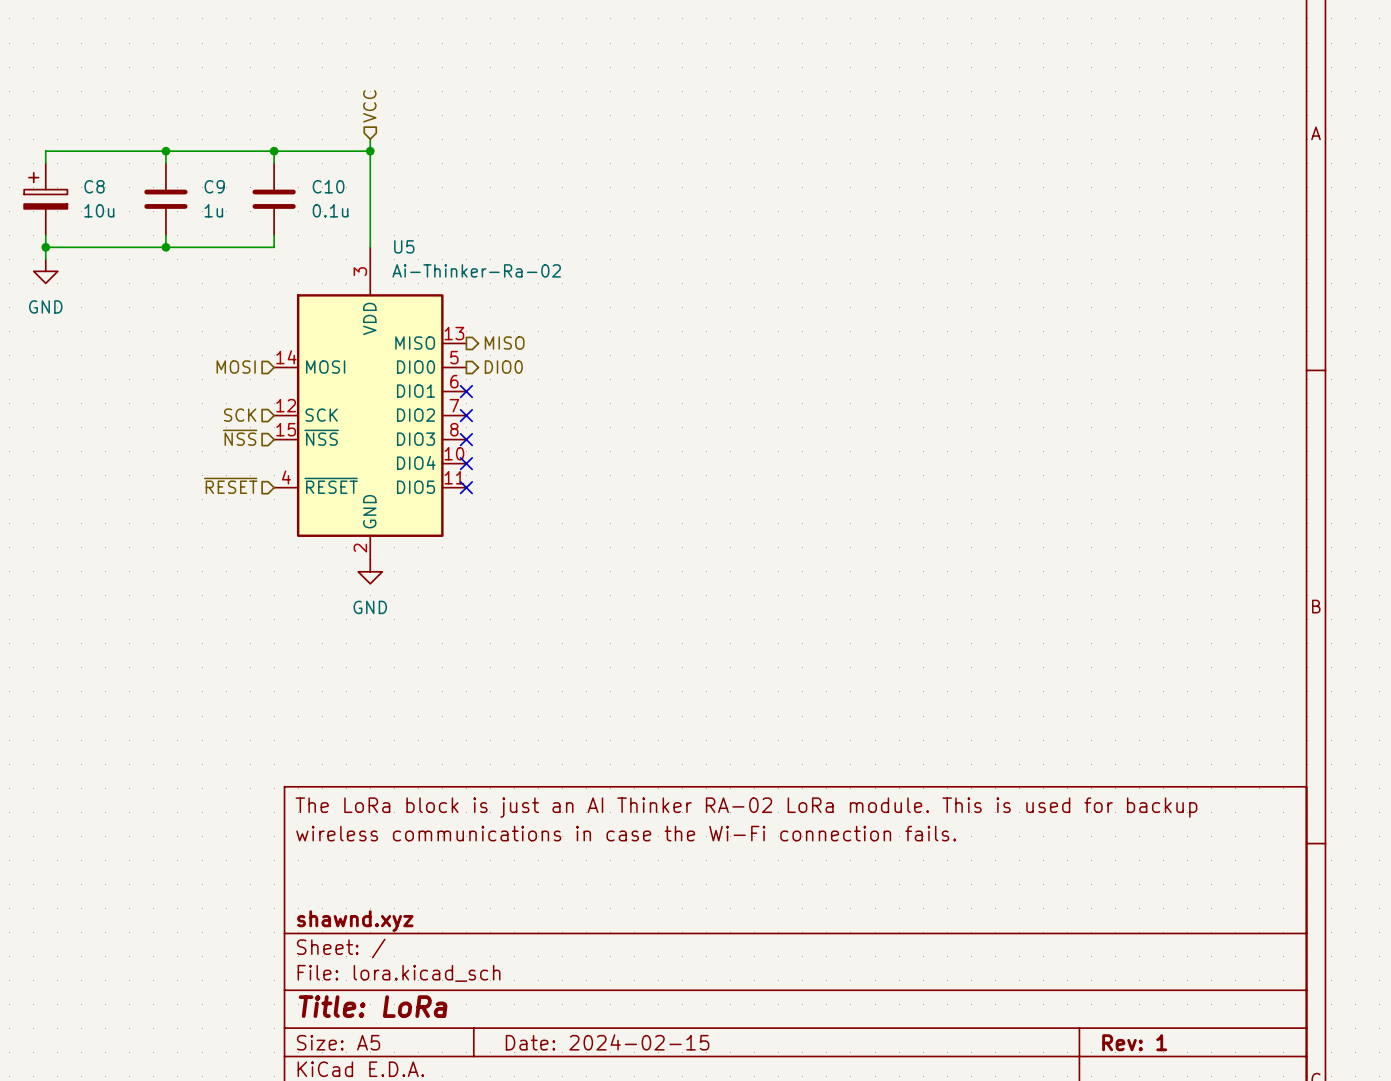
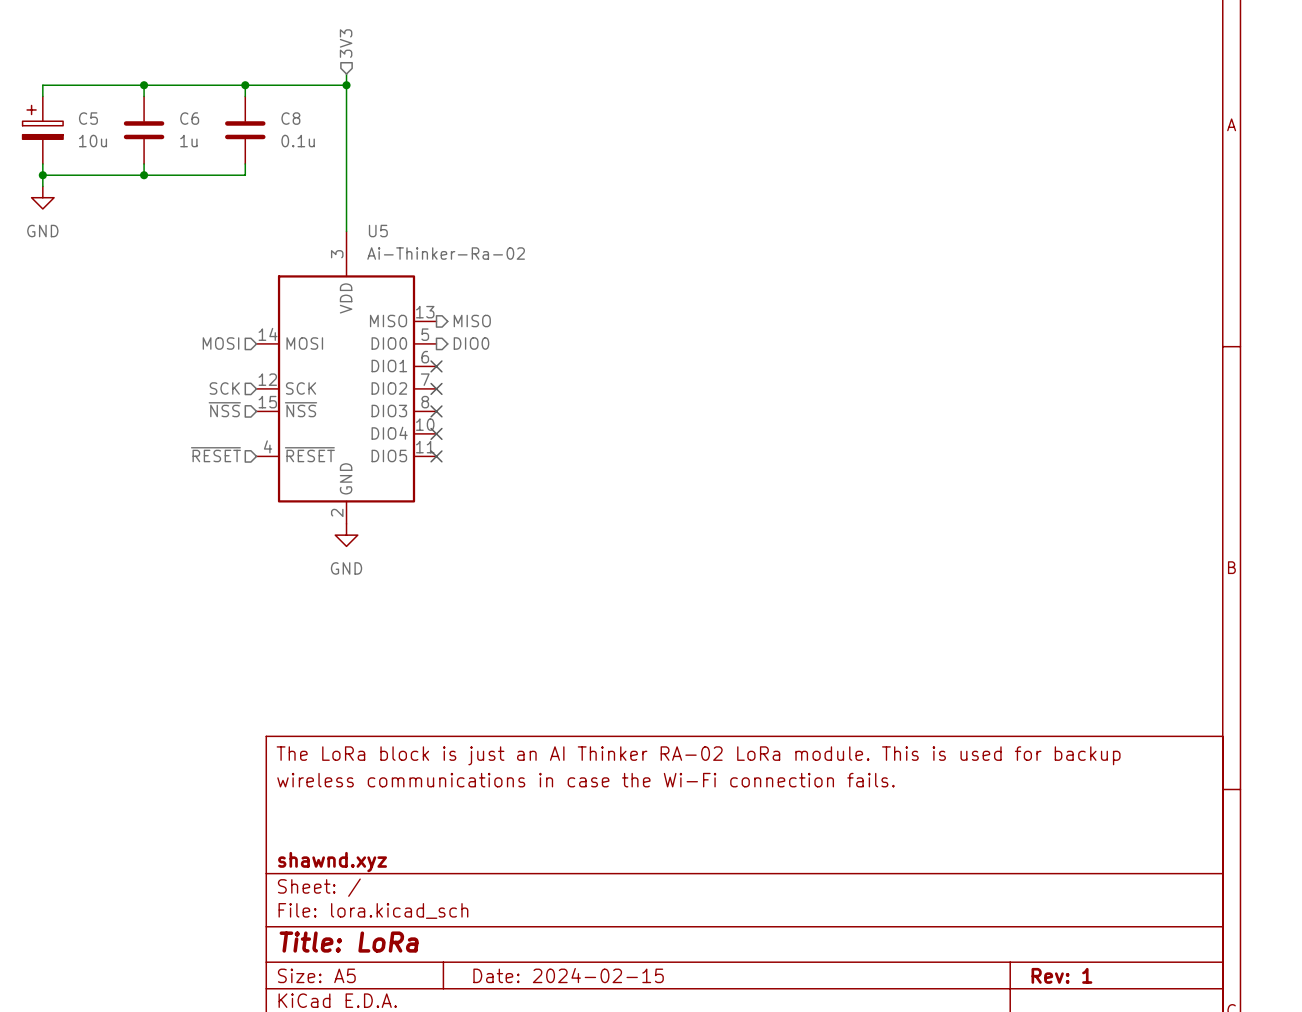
hierarchical label: none -> 3V3 (346, 43)
wire: none -> (346, 73) (346, 130)
junction: none -> (144, 85)
junction: none -> (245, 85)
junction: none -> (346, 85)
hierarchical label: VCC (369, 106) -> none
C5: none -> 10u (42, 130)
C6: none -> 1u (144, 130)
wire: (165, 151) (165, 163) -> (144, 85) (144, 96)
junction: (165, 151) -> none
wire: (274, 151) (274, 163) -> (245, 85) (245, 96)
junction: (274, 151) -> none
wire: (370, 151) (45, 151) (45, 163) -> (346, 85) (42, 85) (42, 96)
junction: (370, 151) -> none
C8 symbol: [24, 163, 68, 236] -> [225, 96, 266, 164]
wire: none -> (245, 163) (245, 175) (42, 175)
junction: none -> (42, 175)
junction: none -> (144, 175)
C9: 1u (165, 199) -> none
C10: 0.1u (274, 199) -> none
C8 value: 10u (99, 210) -> 0.1u (298, 141)
wire: (165, 235) (165, 247) -> (144, 163) (144, 175)
wire: (274, 235) (274, 247) (45, 247) -> none
junction: (45, 247) -> none
junction: (165, 247) -> none
power symbol position: GND (45, 271) -> GND (42, 197)

